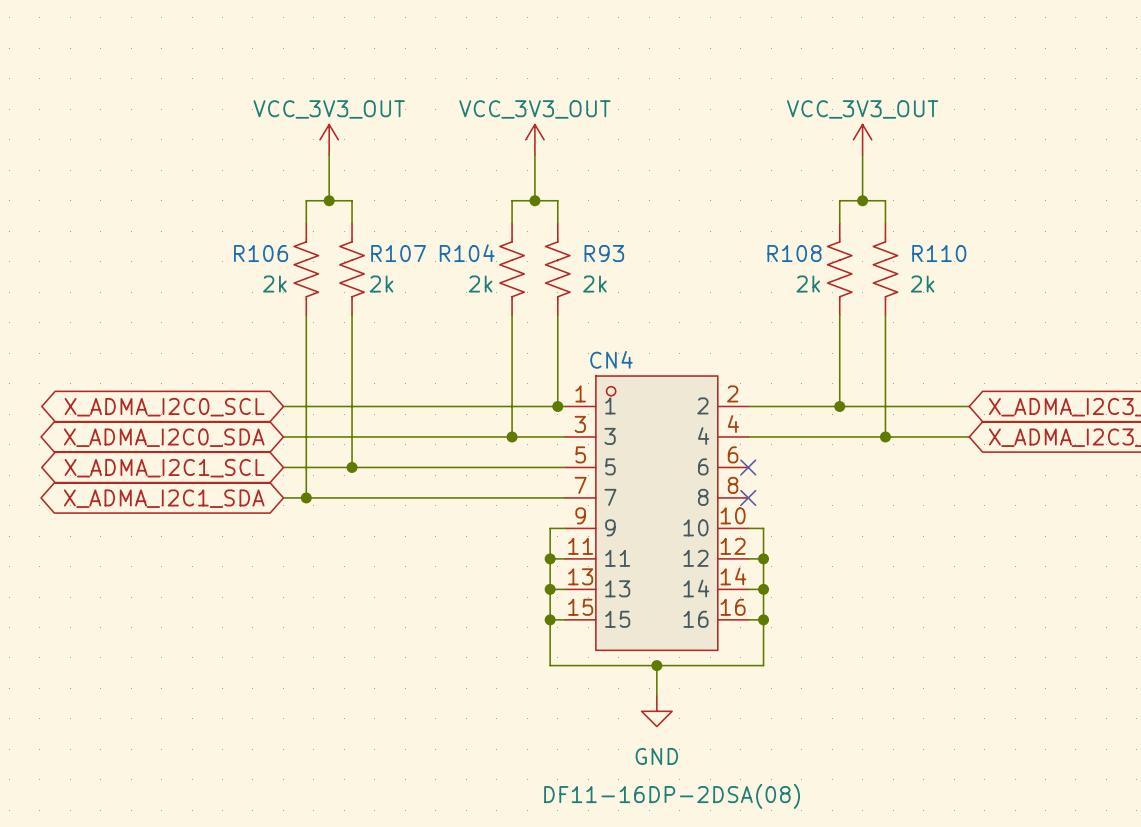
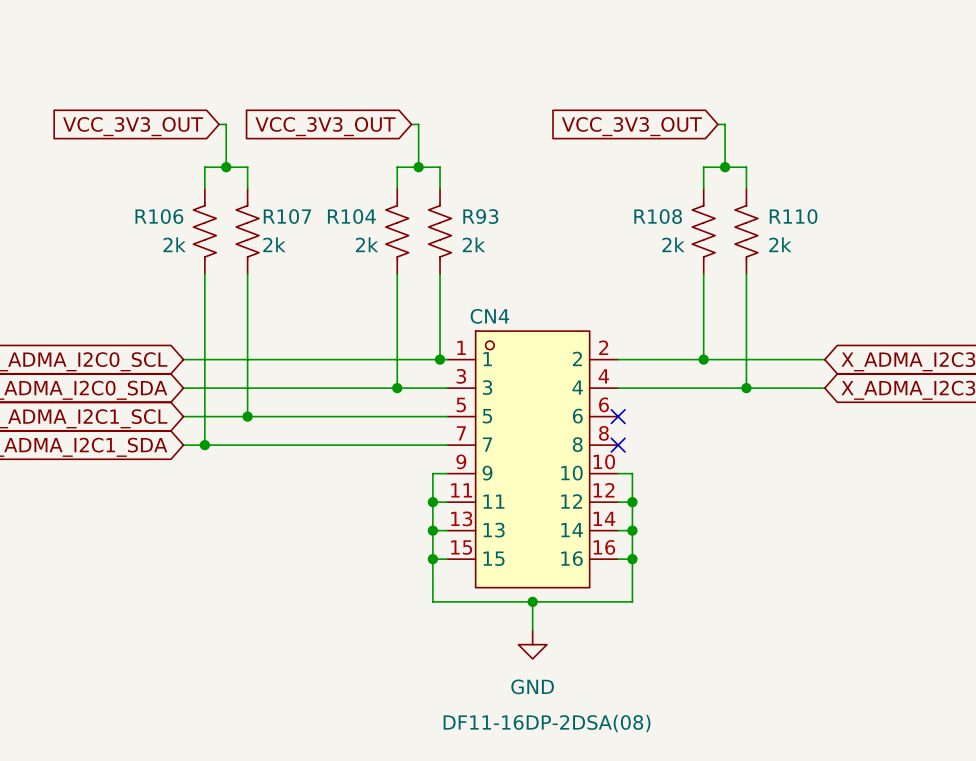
power symbol: VCC_3V3_OUT (329, 139) -> none
power symbol: VCC_3V3_OUT (534, 139) -> none
power symbol: VCC_3V3_OUT (862, 139) -> none
global label: none -> VCC_3V3_OUT (133, 126)
wire: none -> (219, 124) (226, 124)
global label: none -> VCC_3V3_OUT (325, 126)
wire: none -> (411, 124) (418, 124)
global label: none -> VCC_3V3_OUT (631, 126)
wire: none -> (717, 124) (725, 124)

